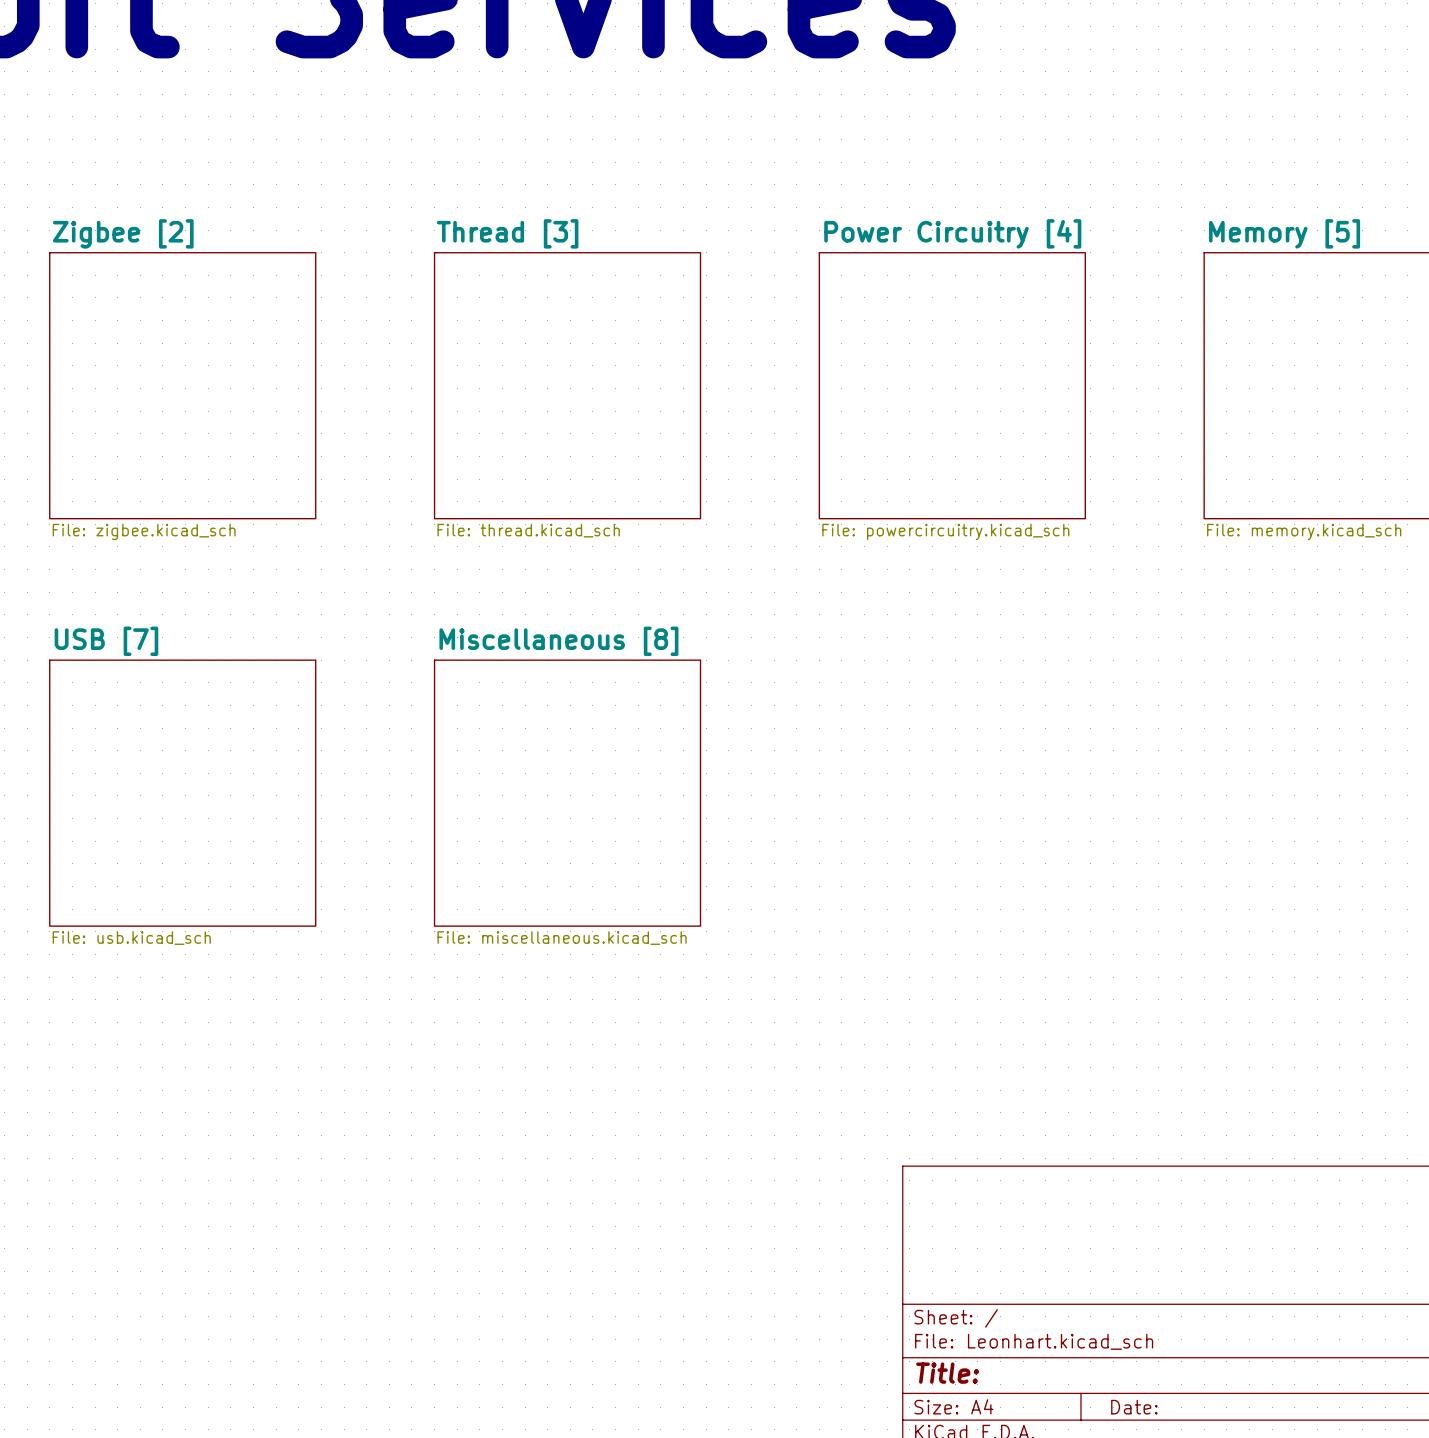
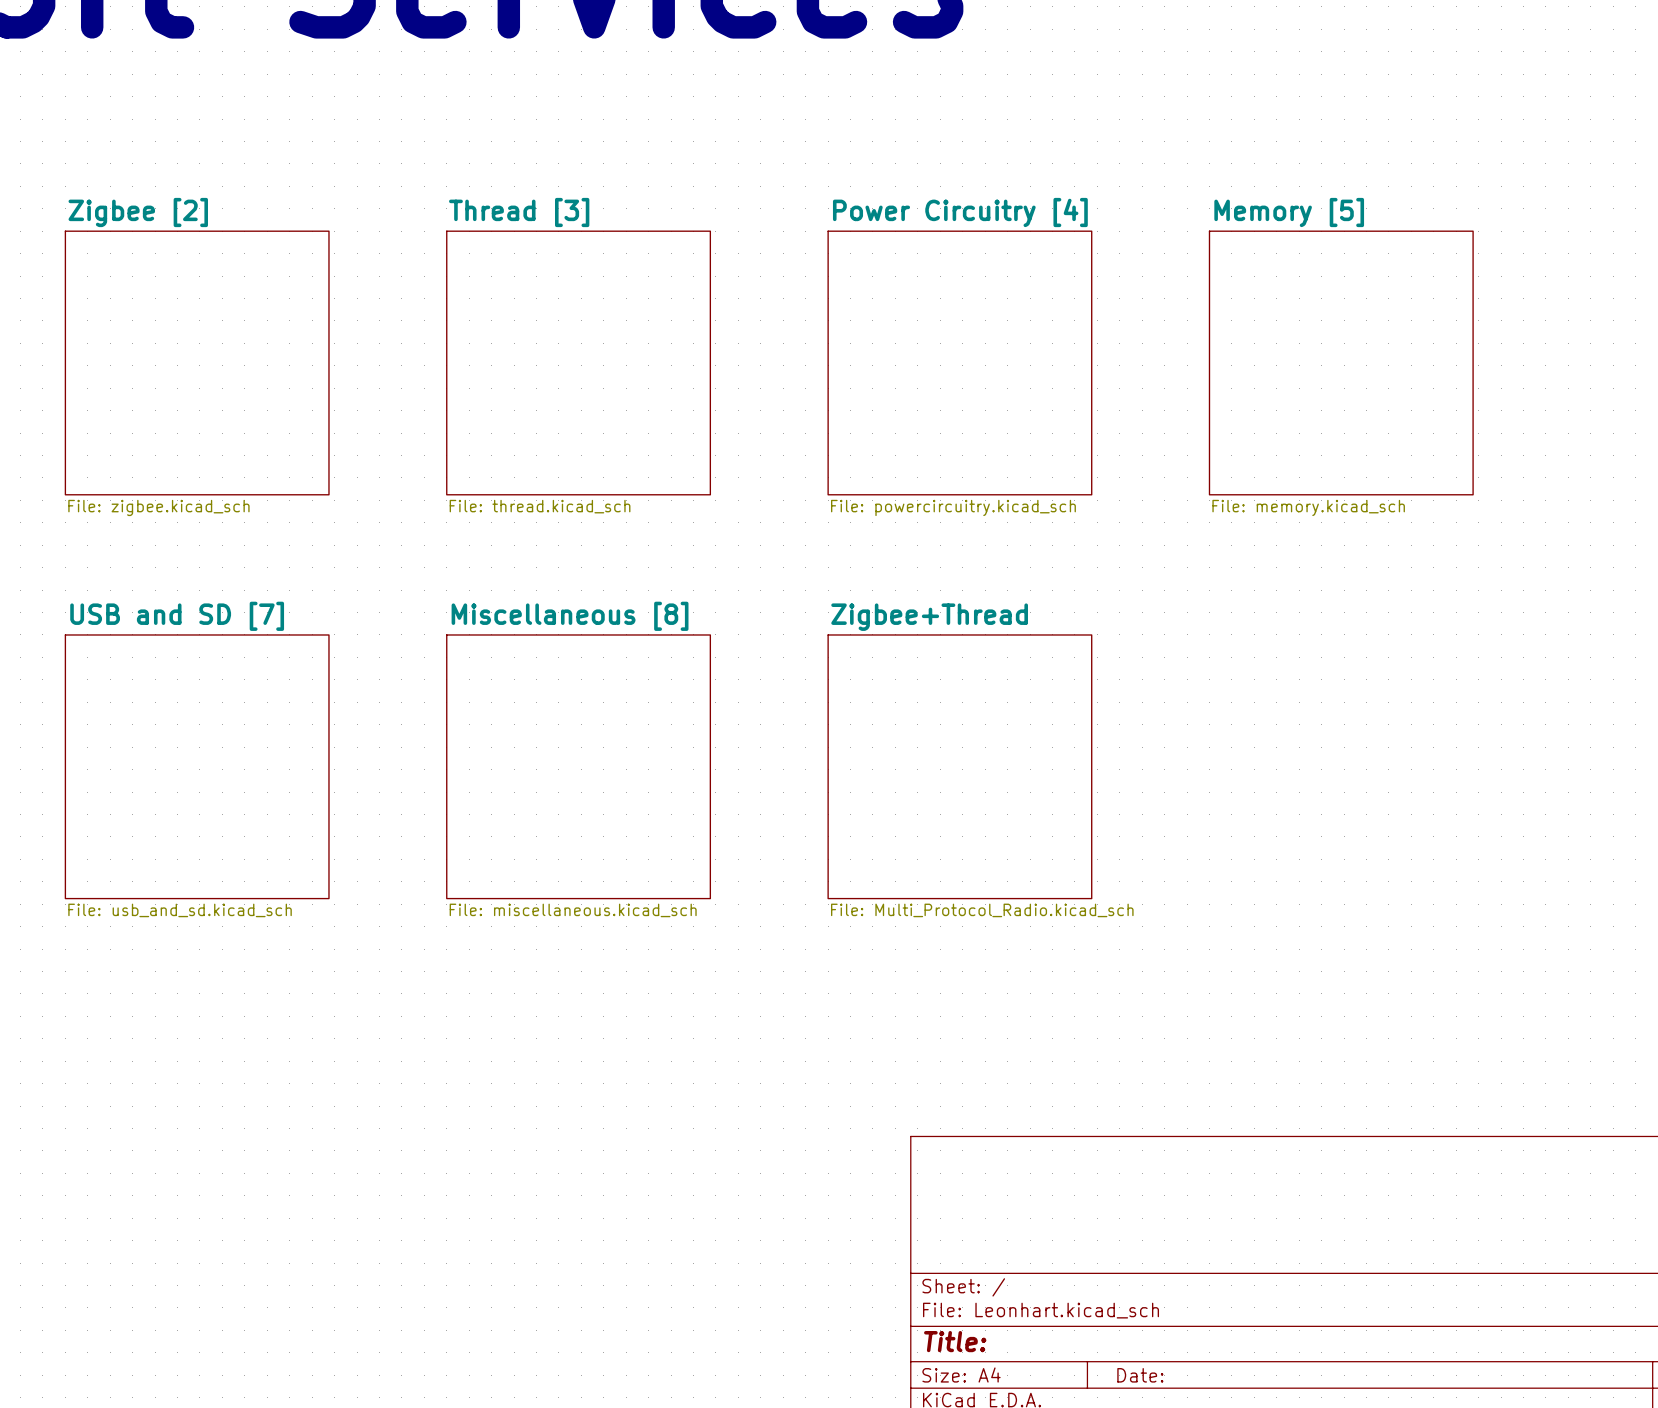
sheet USB [7] name: USB [7] (106, 641) -> USB and SD [7] (177, 616)
sheet Zigbee+Thread: none -> File: Multi_Protocol_Radio.kicad_sch (959, 766)
sheet USB [7] value: File: usb.kicad_sch (131, 938) -> File: usb_and_sd.kicad_sch (180, 910)

